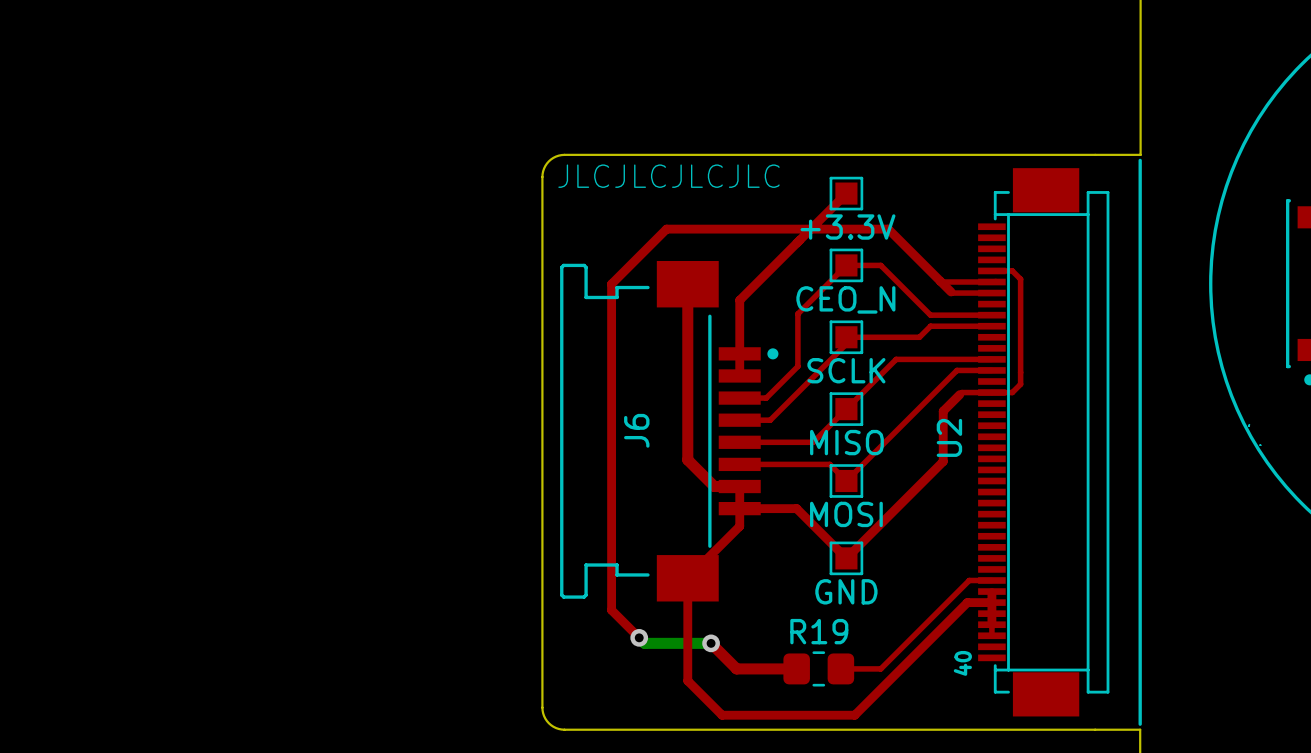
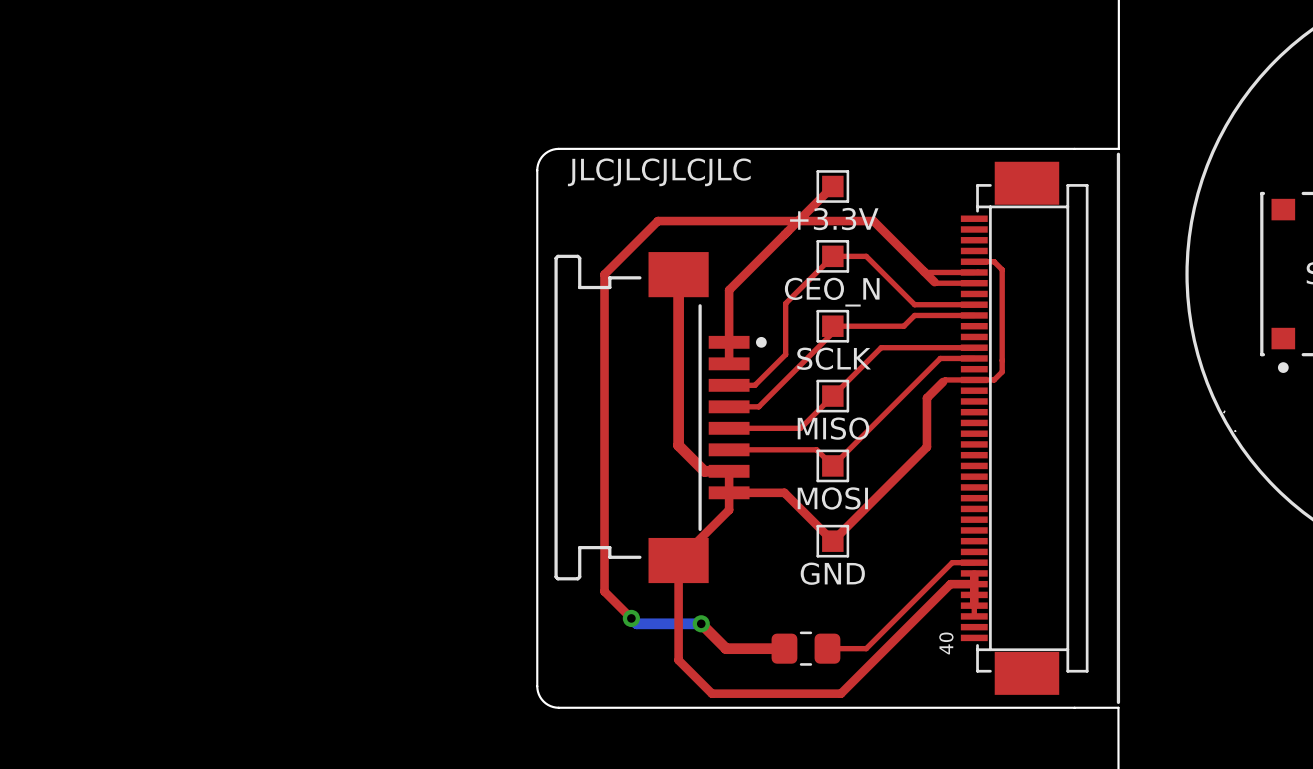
J6 name: J6 (636, 430) -> none
U2 name: U2 (949, 437) -> none
R19 name: R19 (819, 631) -> none

